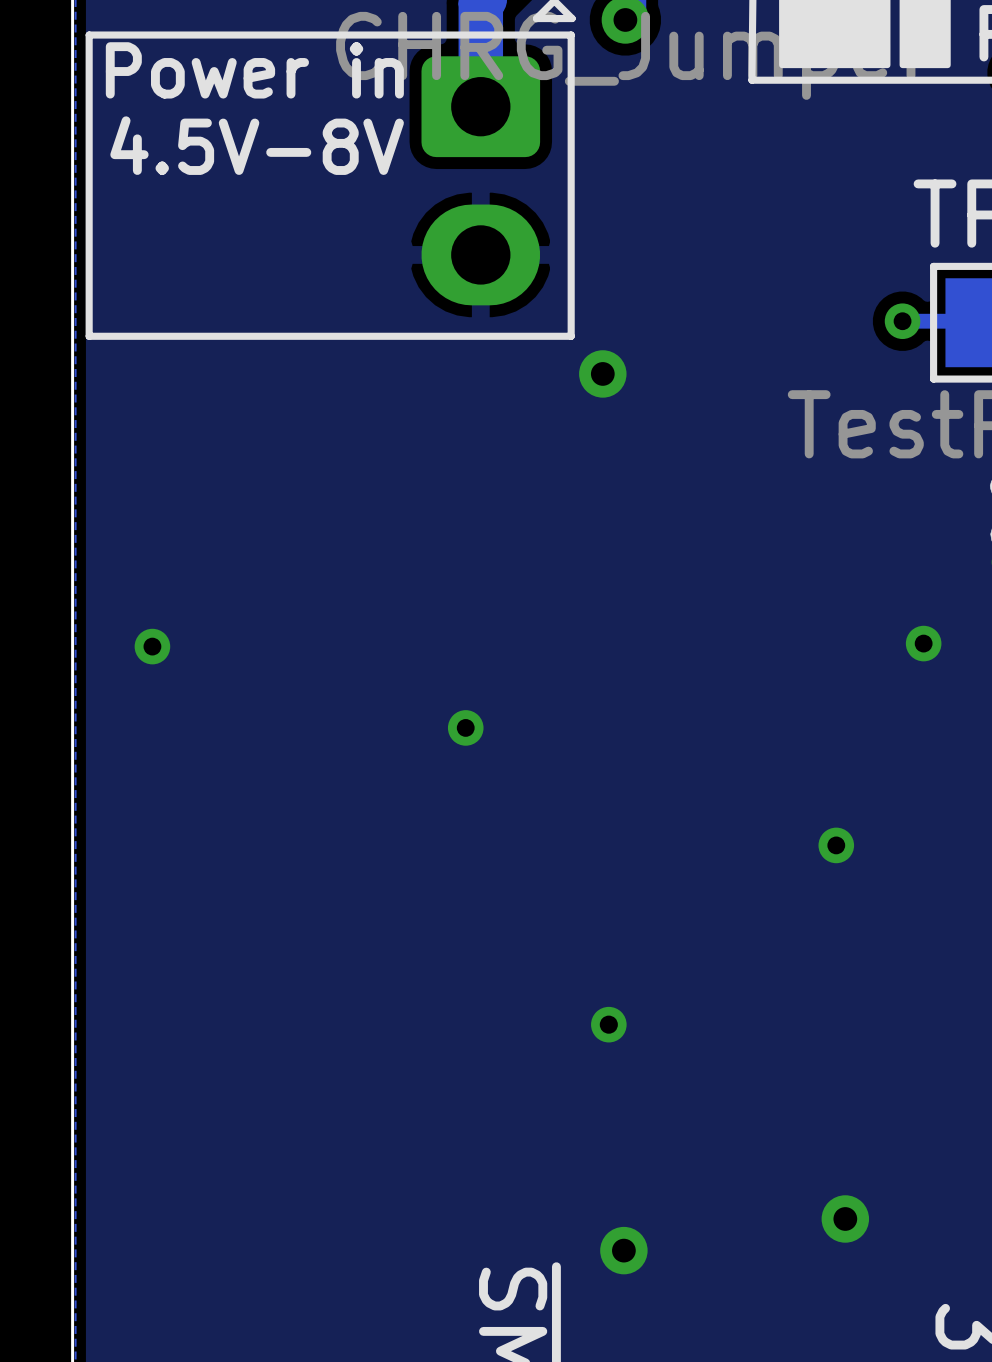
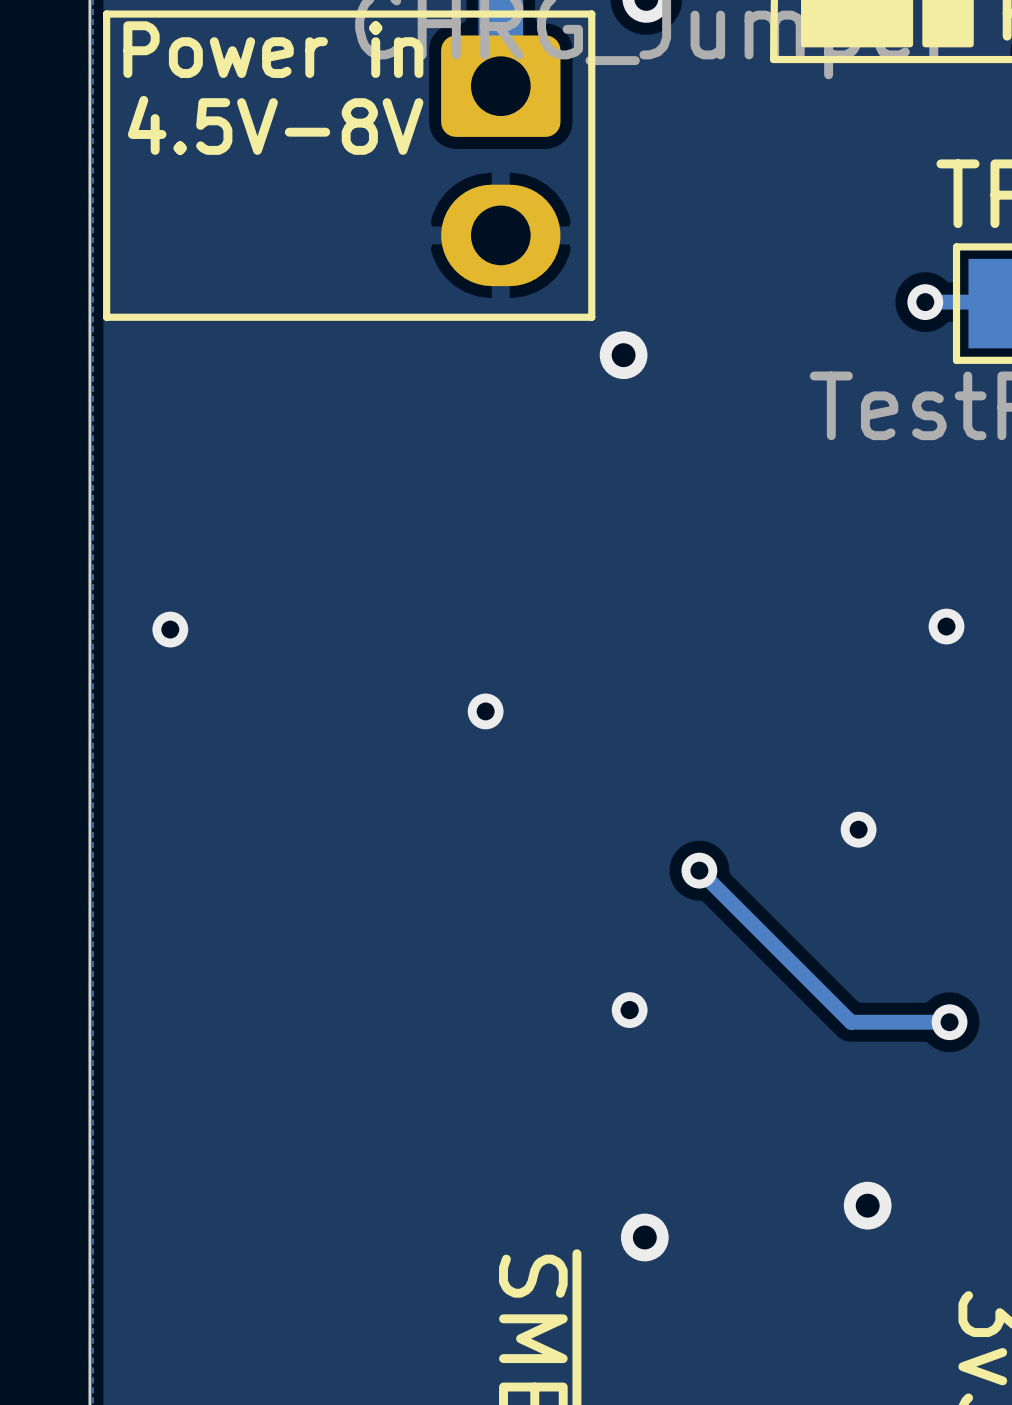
track: none -> (699, 870) (851, 1022) (949, 1022)
via: none -> (699, 870)
via: none -> (949, 1022)

